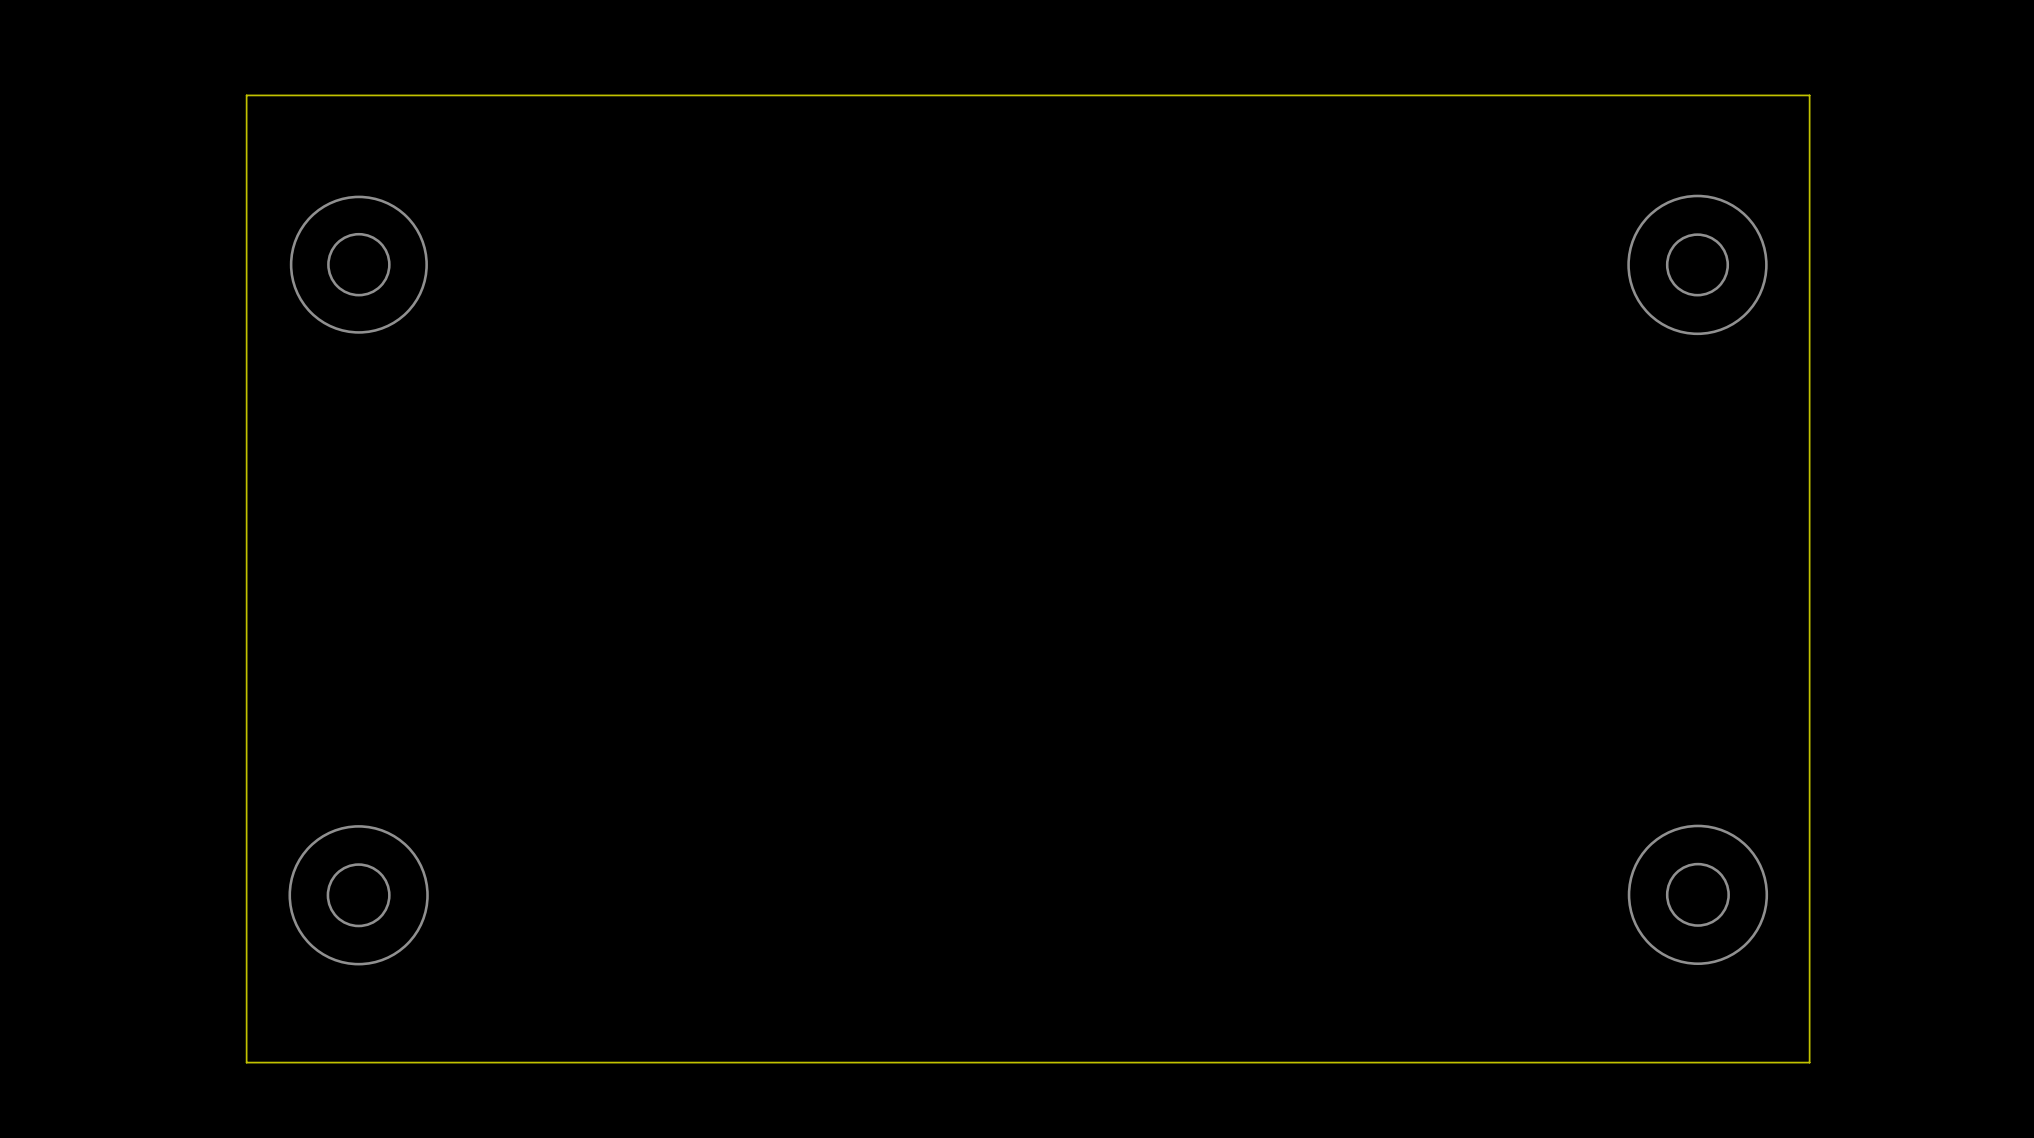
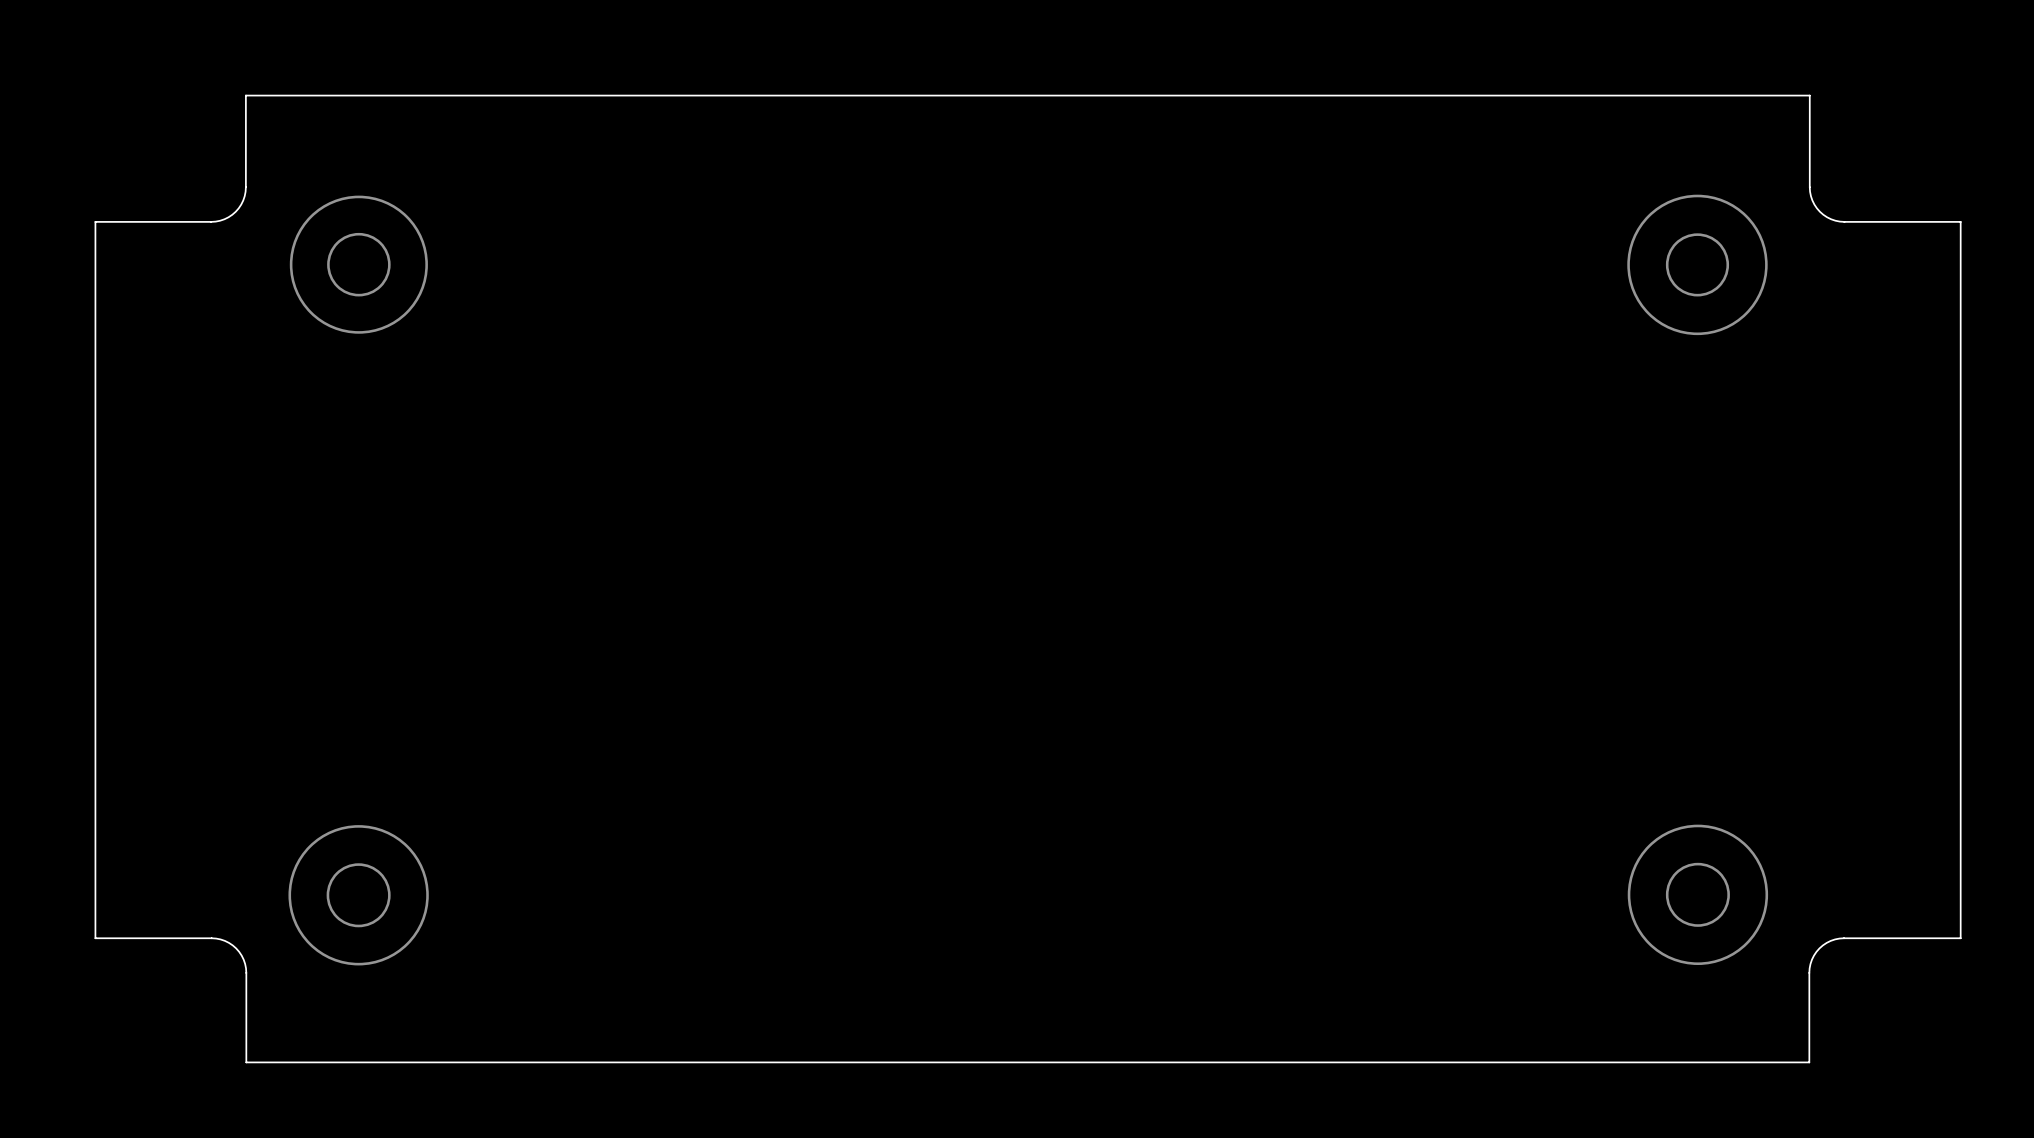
board edge: (246, 95) (246, 1062) (1809, 1062) (1809, 95) (246, 95) -> (245, 95) (245, 191) (241, 204) (232, 214) (224, 219) (211, 221) (95, 221) (95, 938) (211, 938) (224, 940) (232, 945) (241, 955) (246, 968) (246, 1062) (1809, 1062) (1809, 968) (1813, 955) (1822, 945) (1830, 940) (1843, 938) (1960, 938) (1960, 221) (1844, 221) (1831, 219) (1823, 214) (1814, 204) (1810, 191) (1809, 95) (245, 95)

